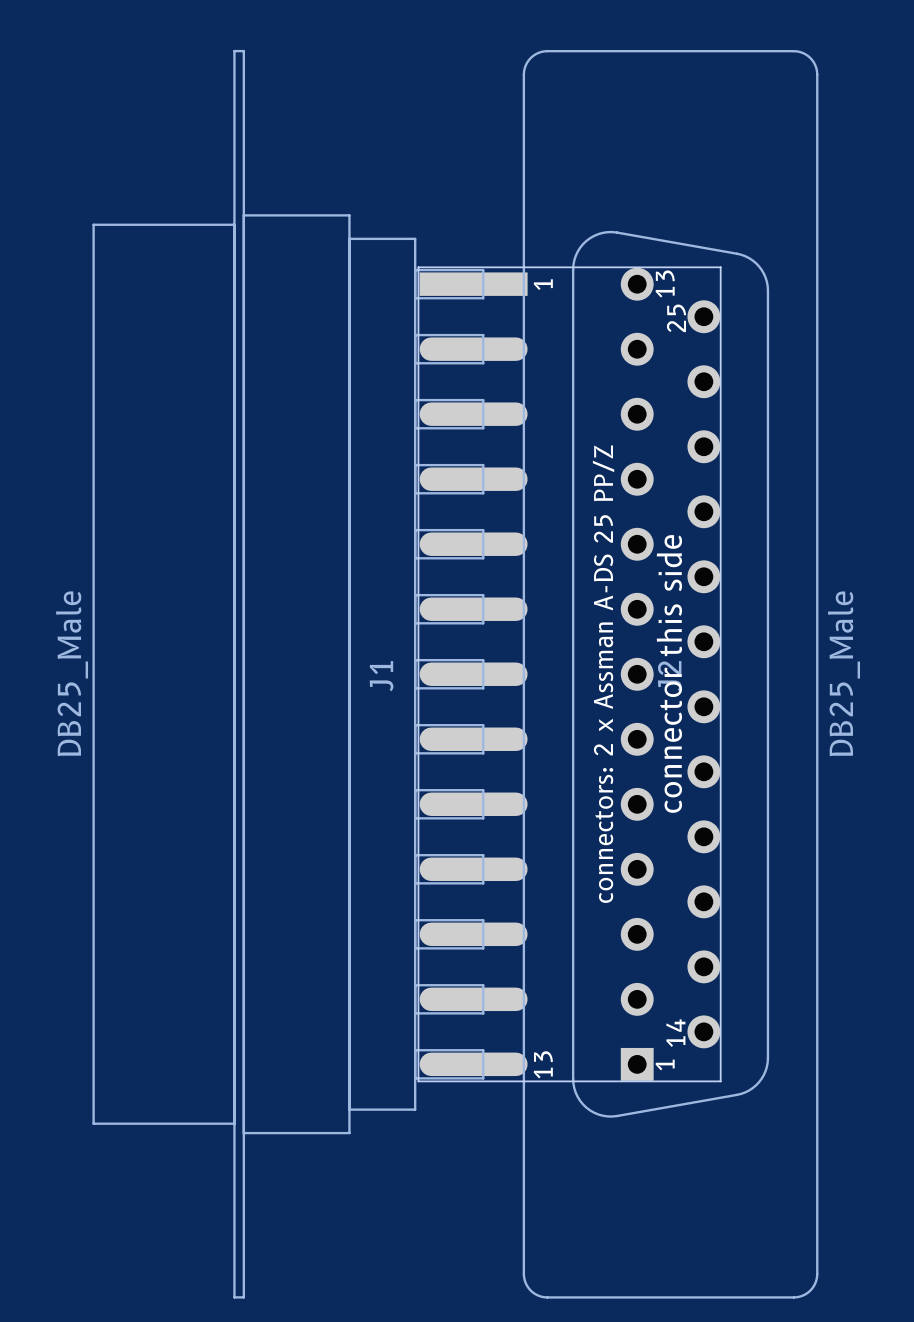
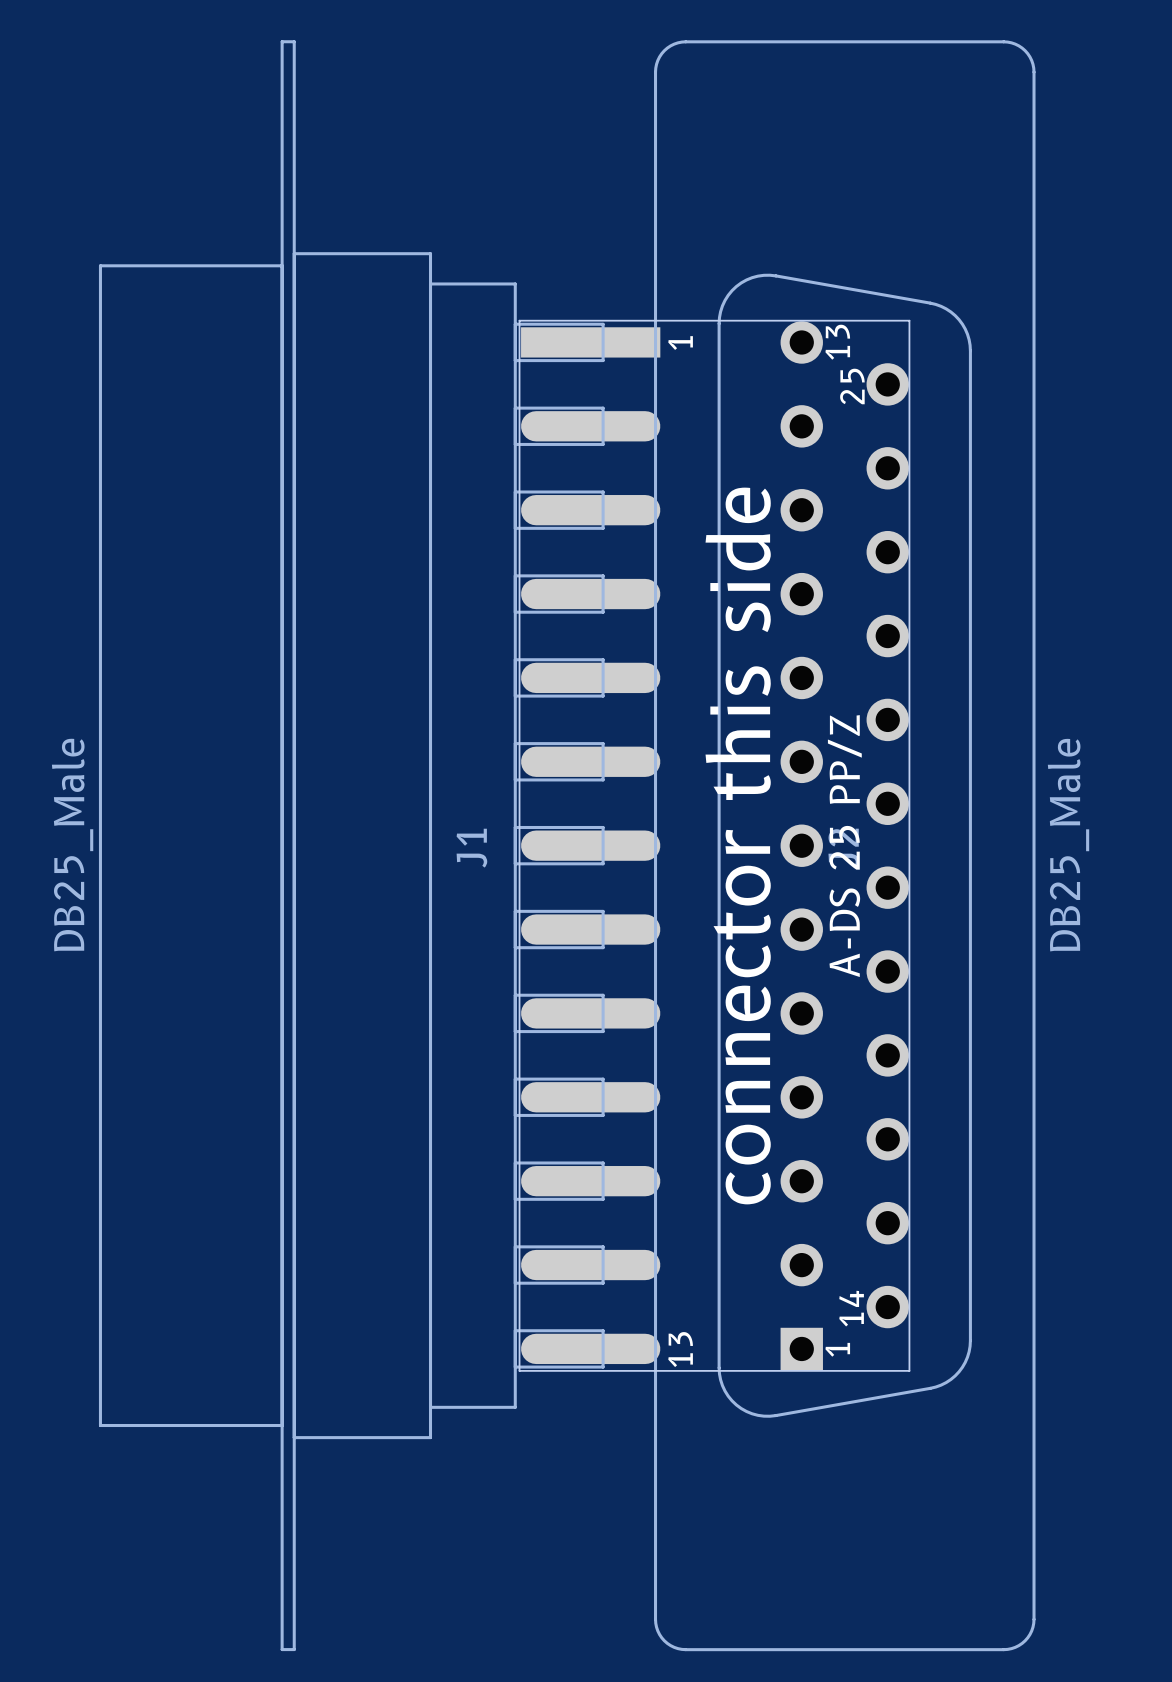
text: connector this side (669, 673) -> A-DS 25 PP/Z (844, 846)
text: connectors: 2 x Assman A-DS 25 PP/Z (603, 674) -> connector this side (738, 846)

